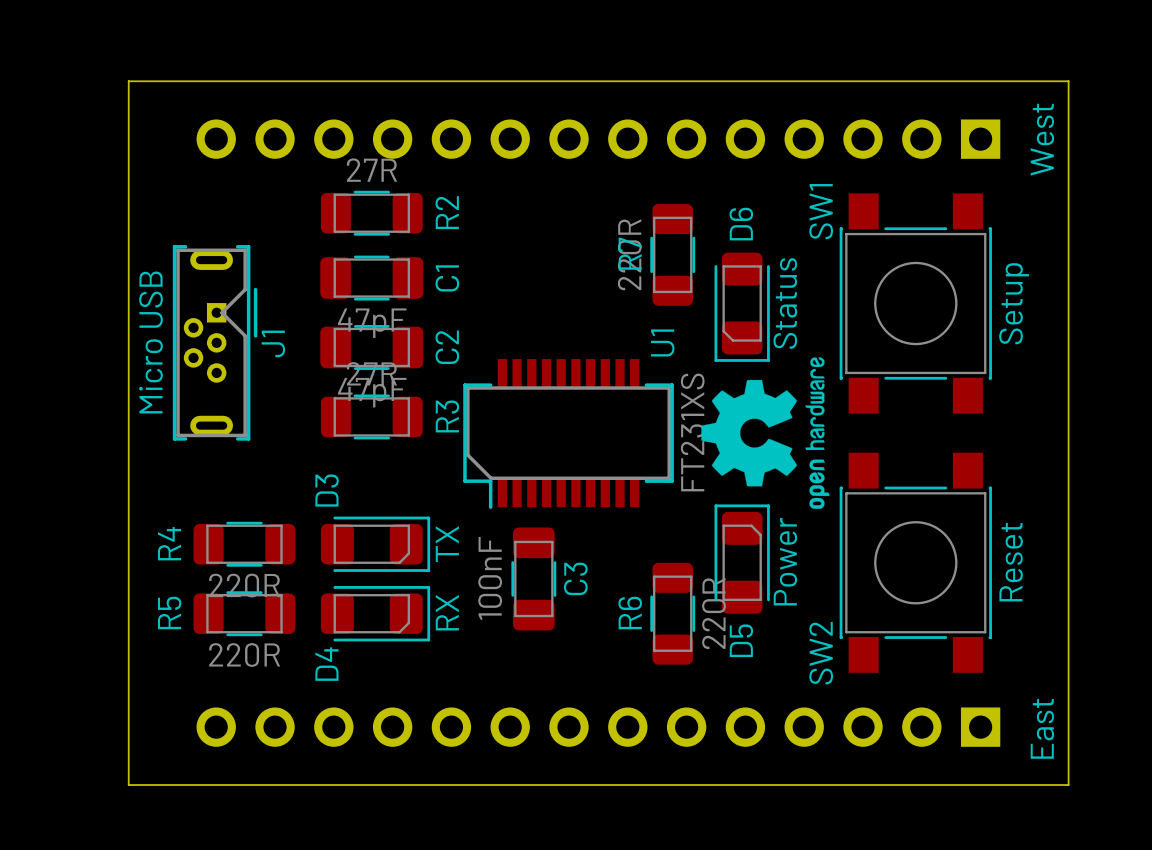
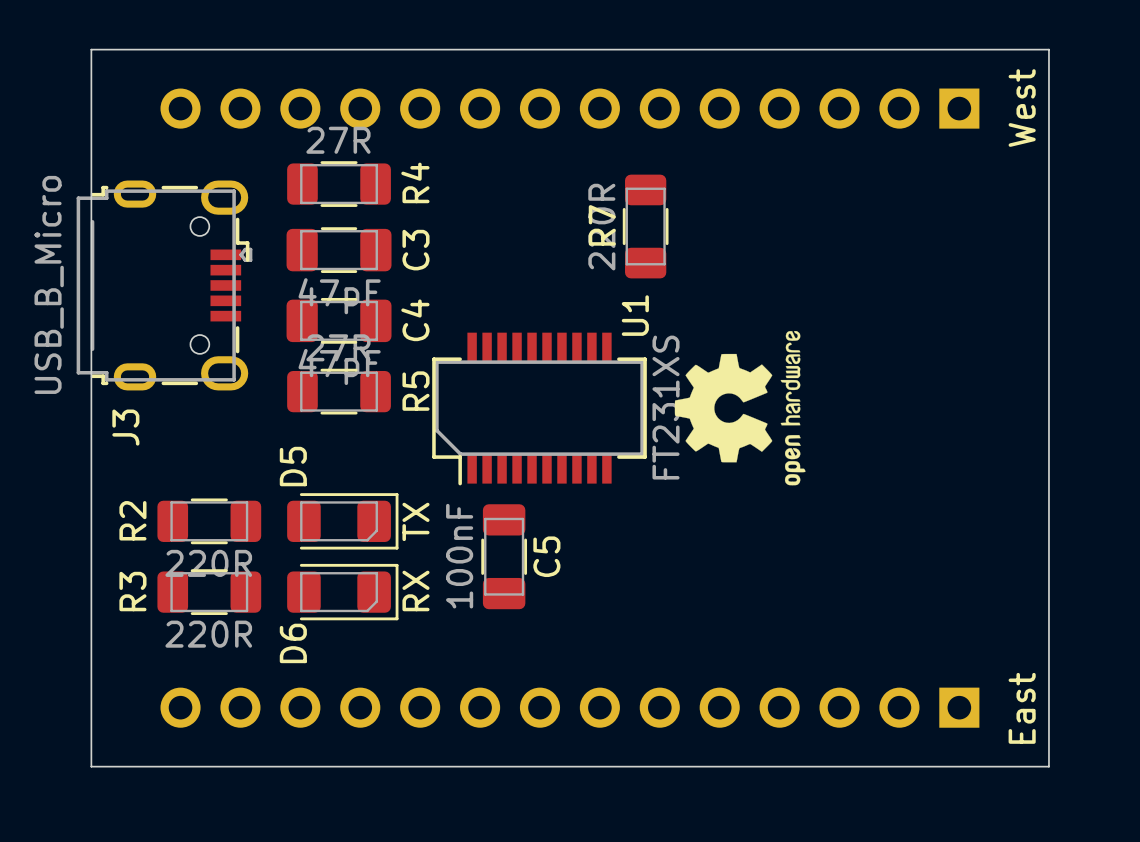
R2 name: R2 (447, 212) -> R4 (415, 182)
C1 name: C1 (447, 278) -> C3 (415, 250)
SW1: Setup (915, 303) -> none
D6: Status (742, 307) -> none
J3: none -> USB_B_Micro (164, 285)
J1: Micro USB (215, 342) -> none
C2 name: C2 (447, 347) -> C4 (415, 320)
R3 name: R3 (447, 416) -> R5 (415, 391)
D3 name: D3 (327, 490) -> D5 (293, 466)
R4 name: R4 (169, 543) -> R2 (132, 520)
D5: Power (742, 559) -> none
SW2: Reset (915, 562) -> none
C3 name: C3 (575, 578) -> C5 (546, 556)
R5 name: R5 (169, 612) -> R3 (132, 591)
R6: 220R (672, 613) -> none
D4 name: D4 (326, 664) -> D6 (293, 643)

